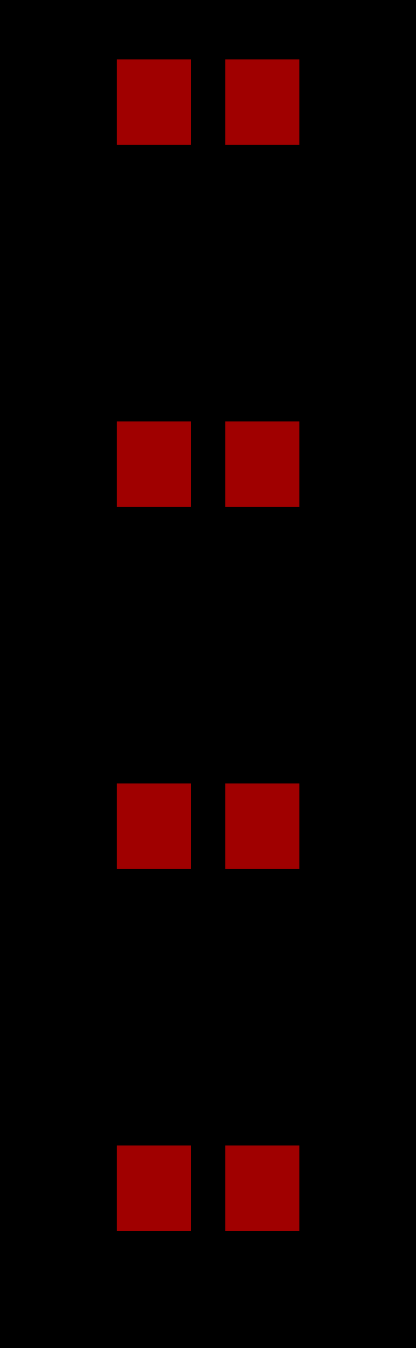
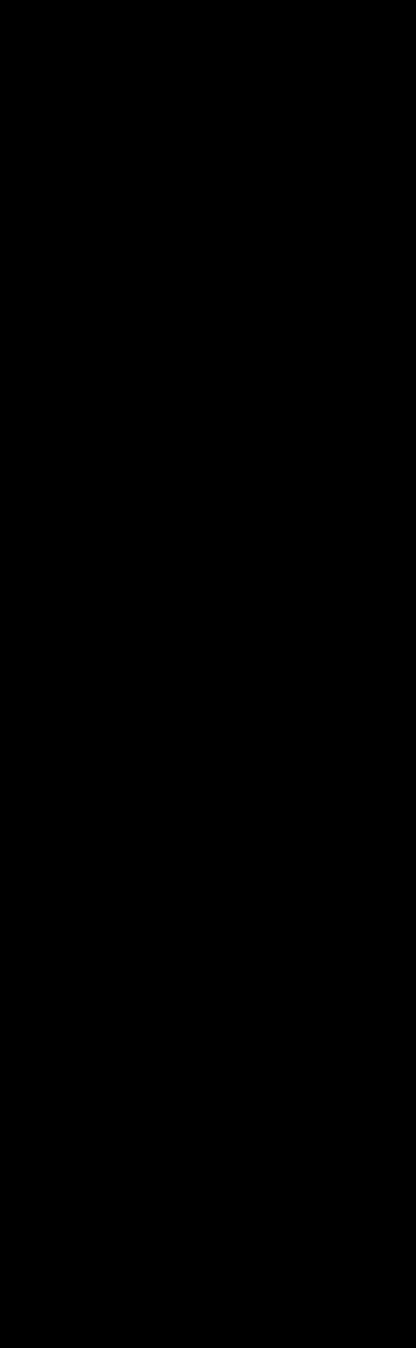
part: (208, 102) -> none
part: (208, 464) -> none
part: (208, 826) -> none
part: (208, 1188) -> none

